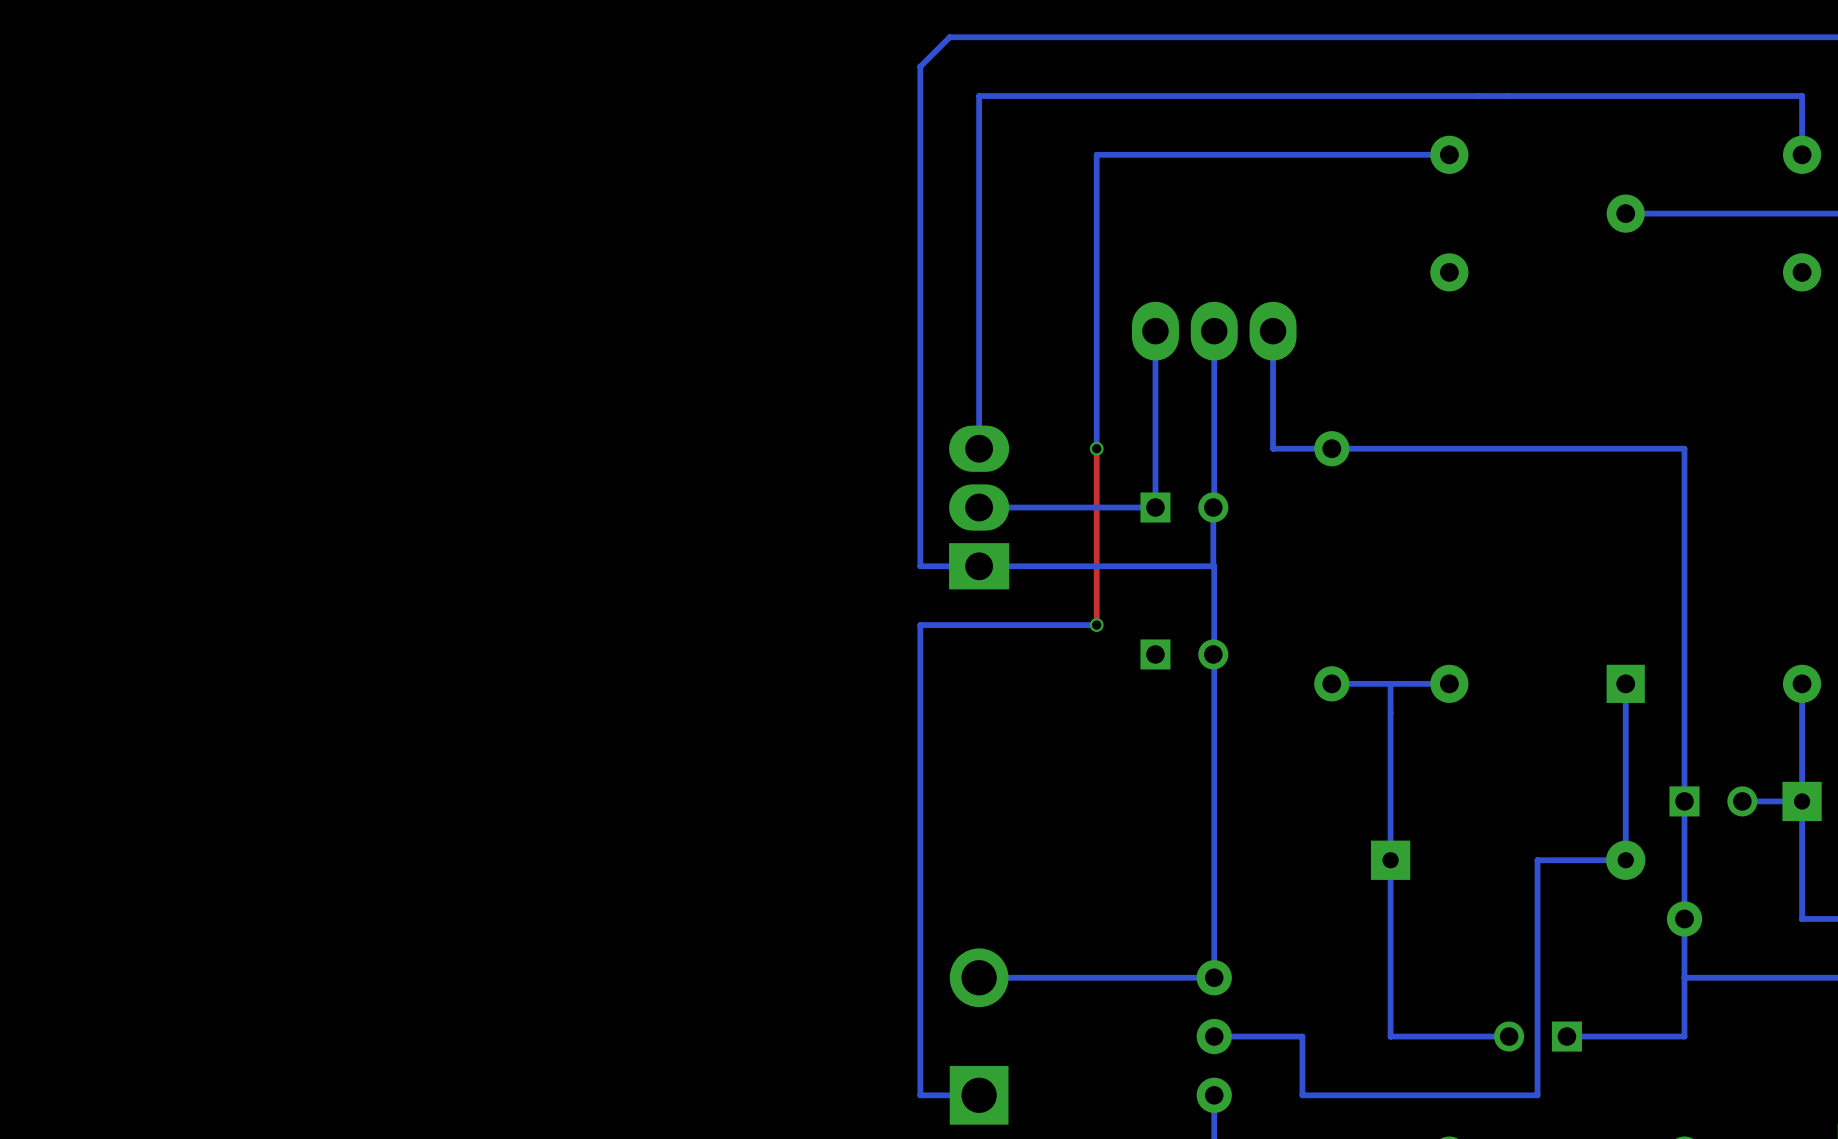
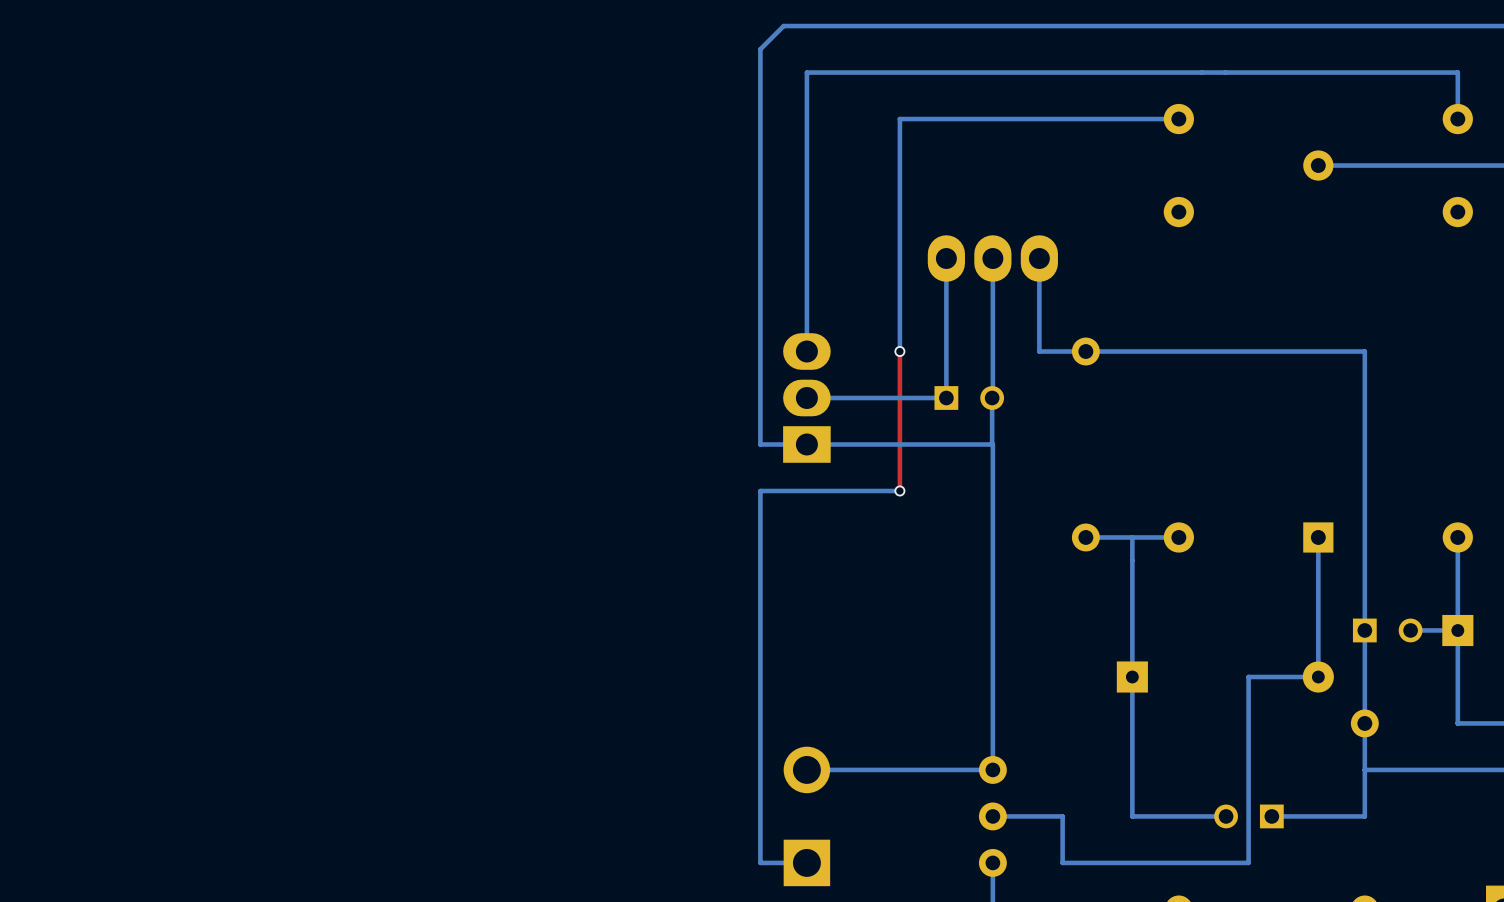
part: (1184, 654) -> none

